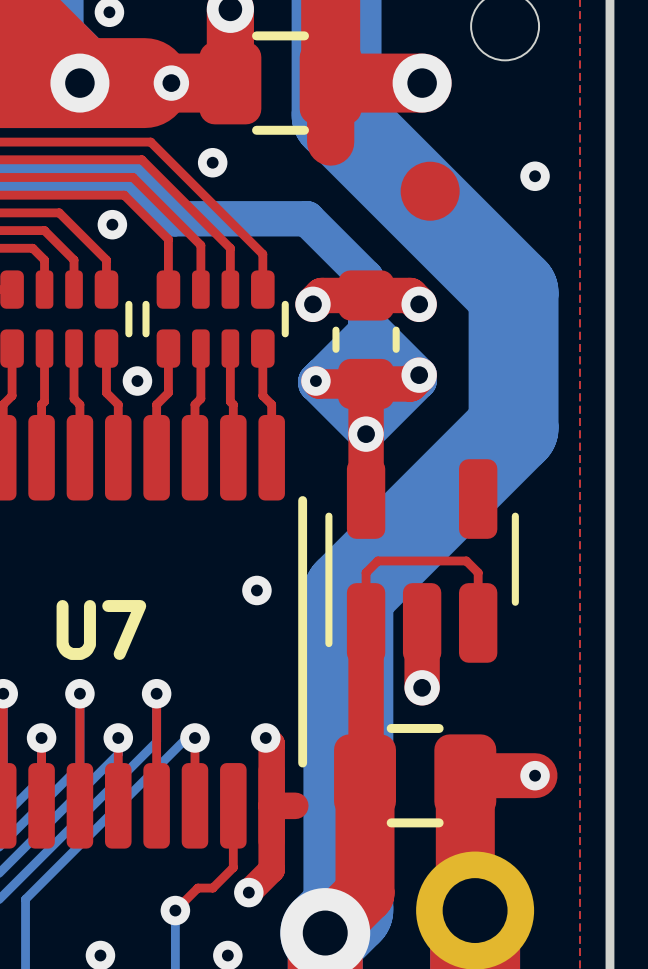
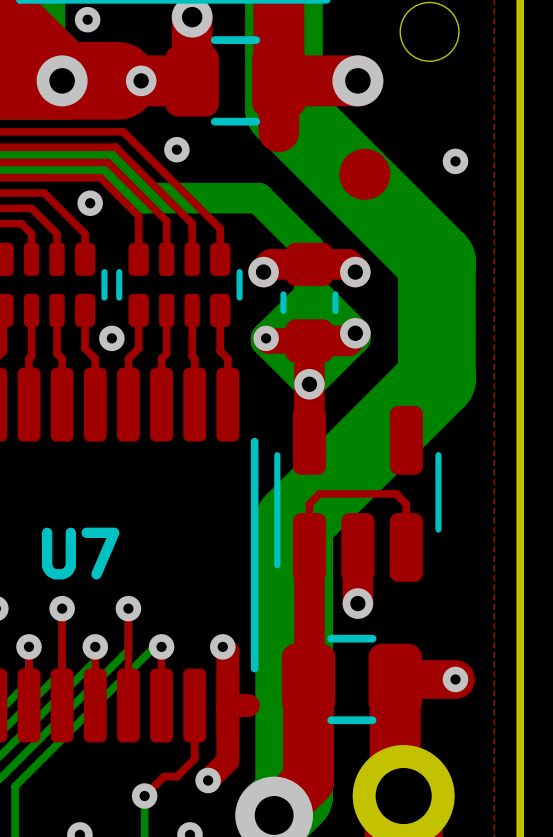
via: (256, 590) -> none

